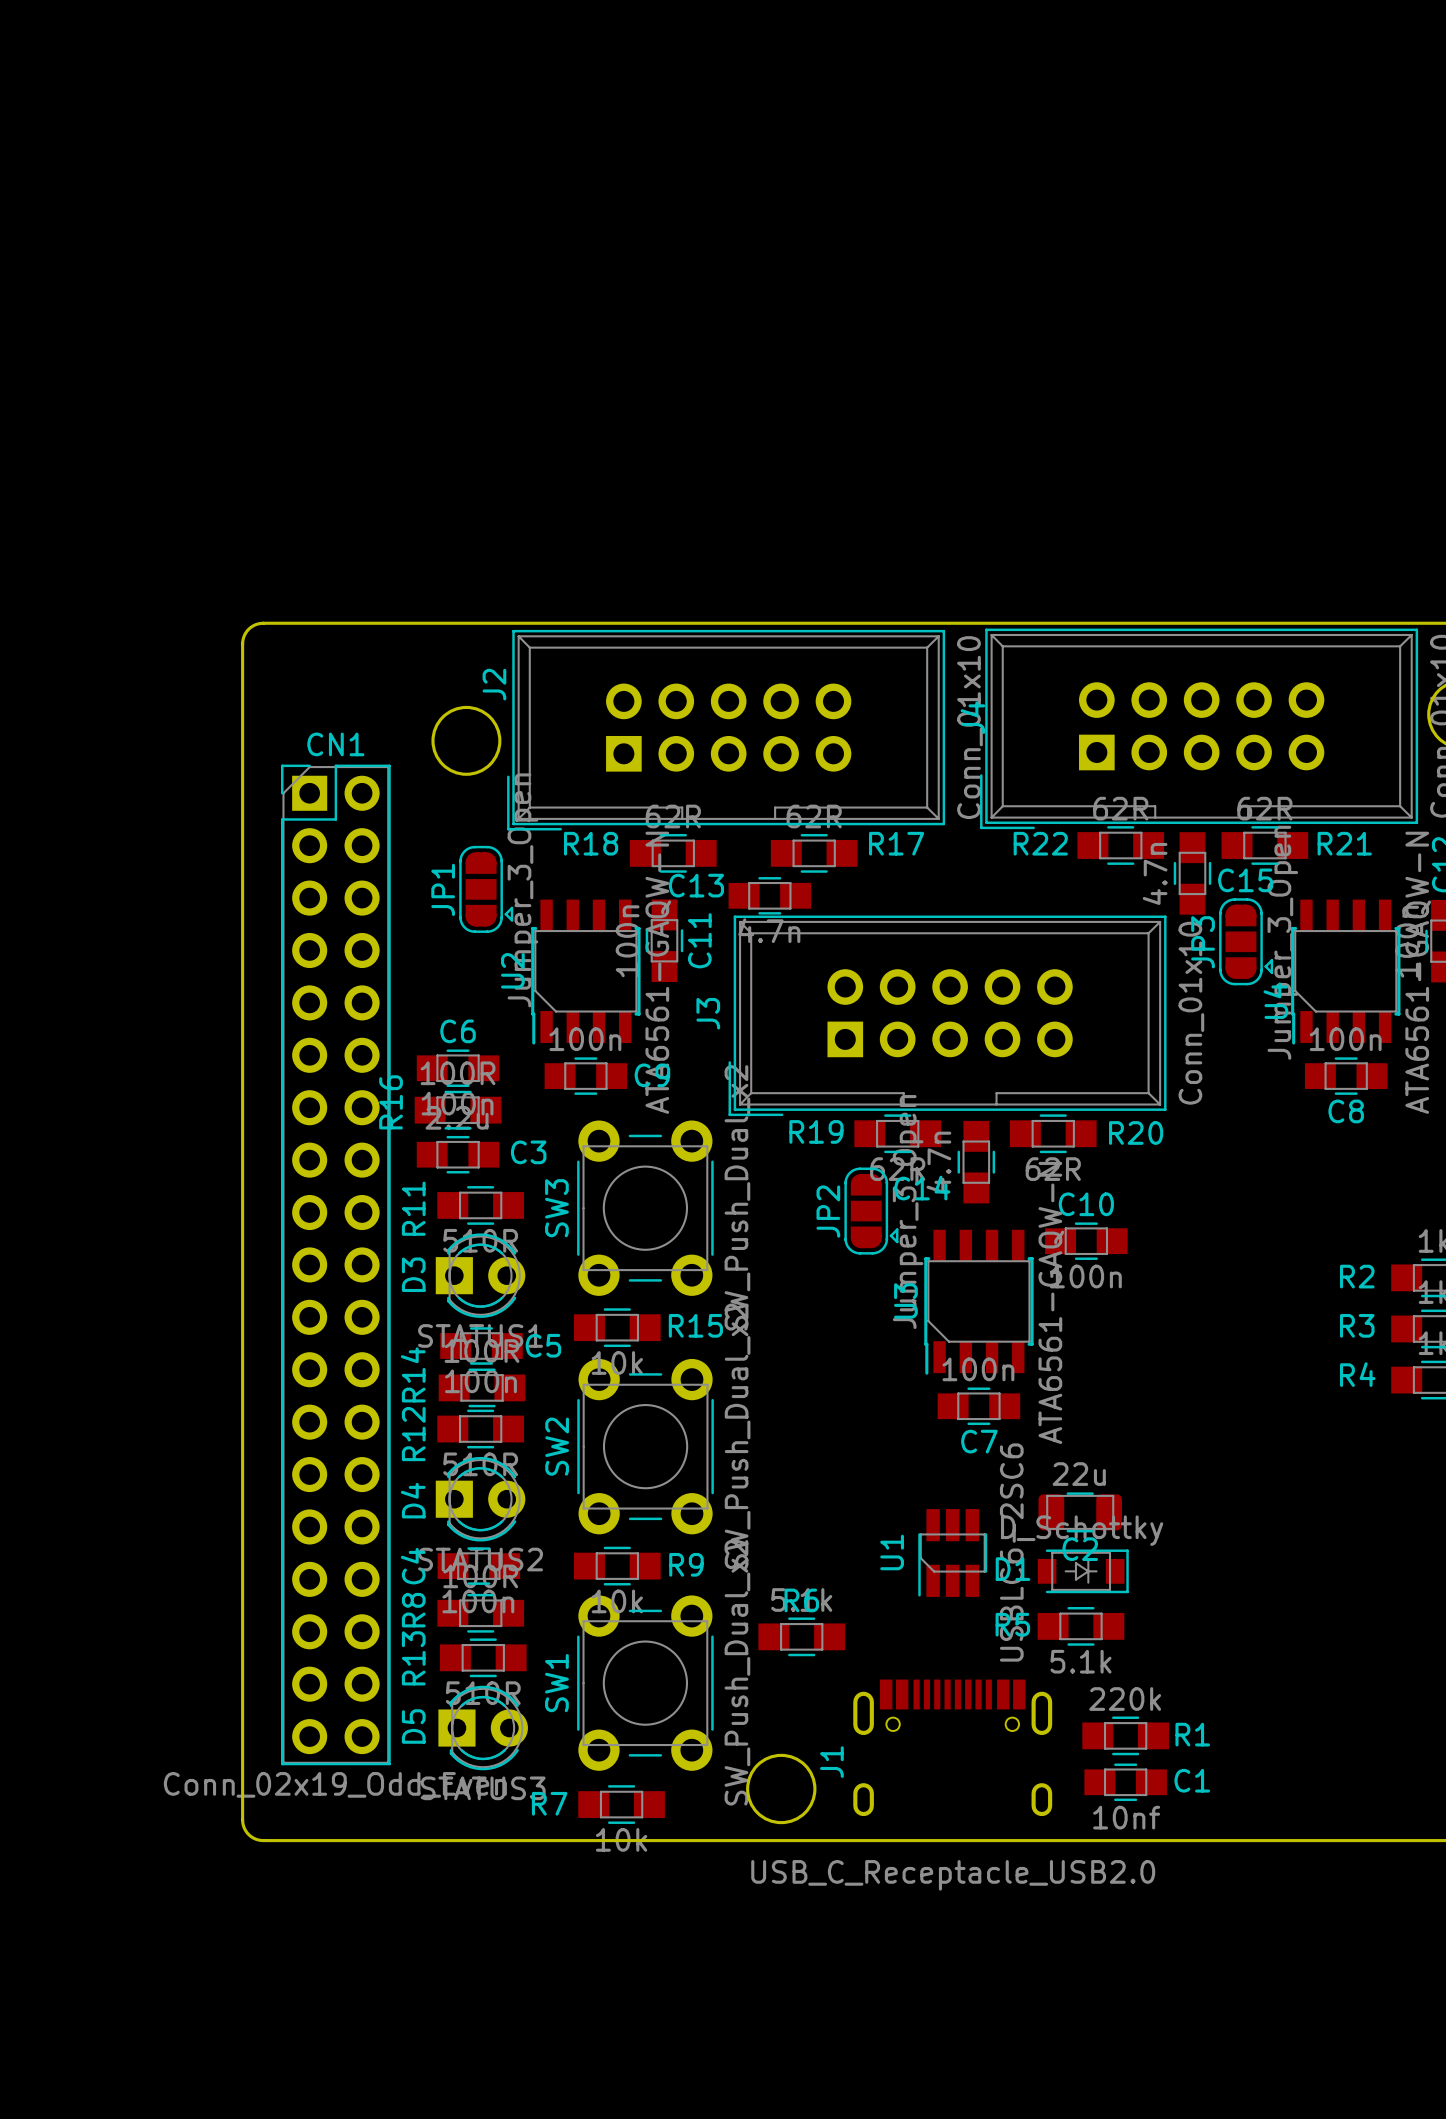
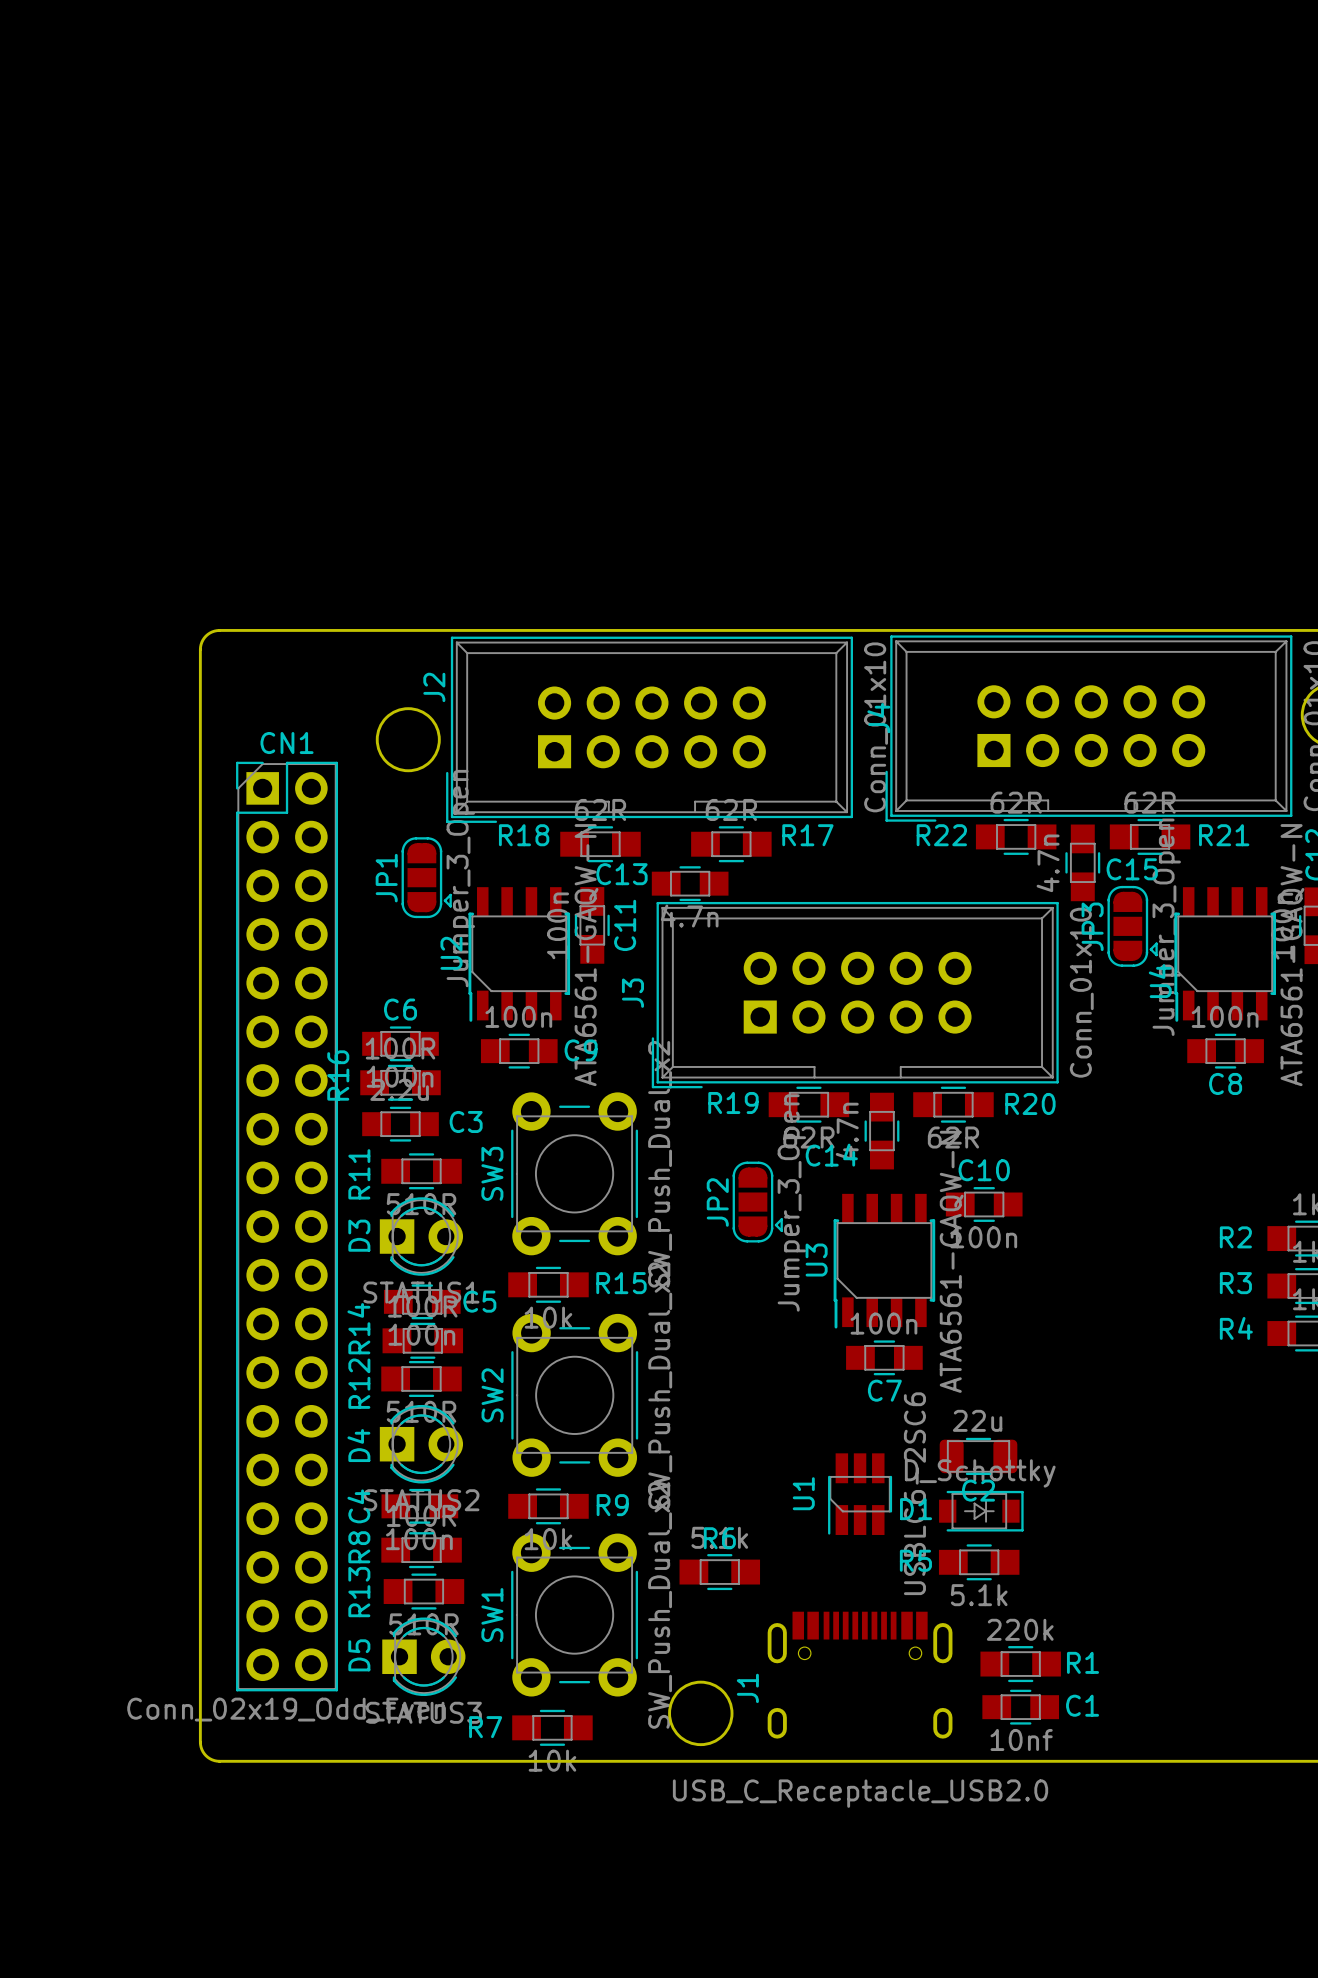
JP2 position: (871, 1211) -> (757, 1202)

